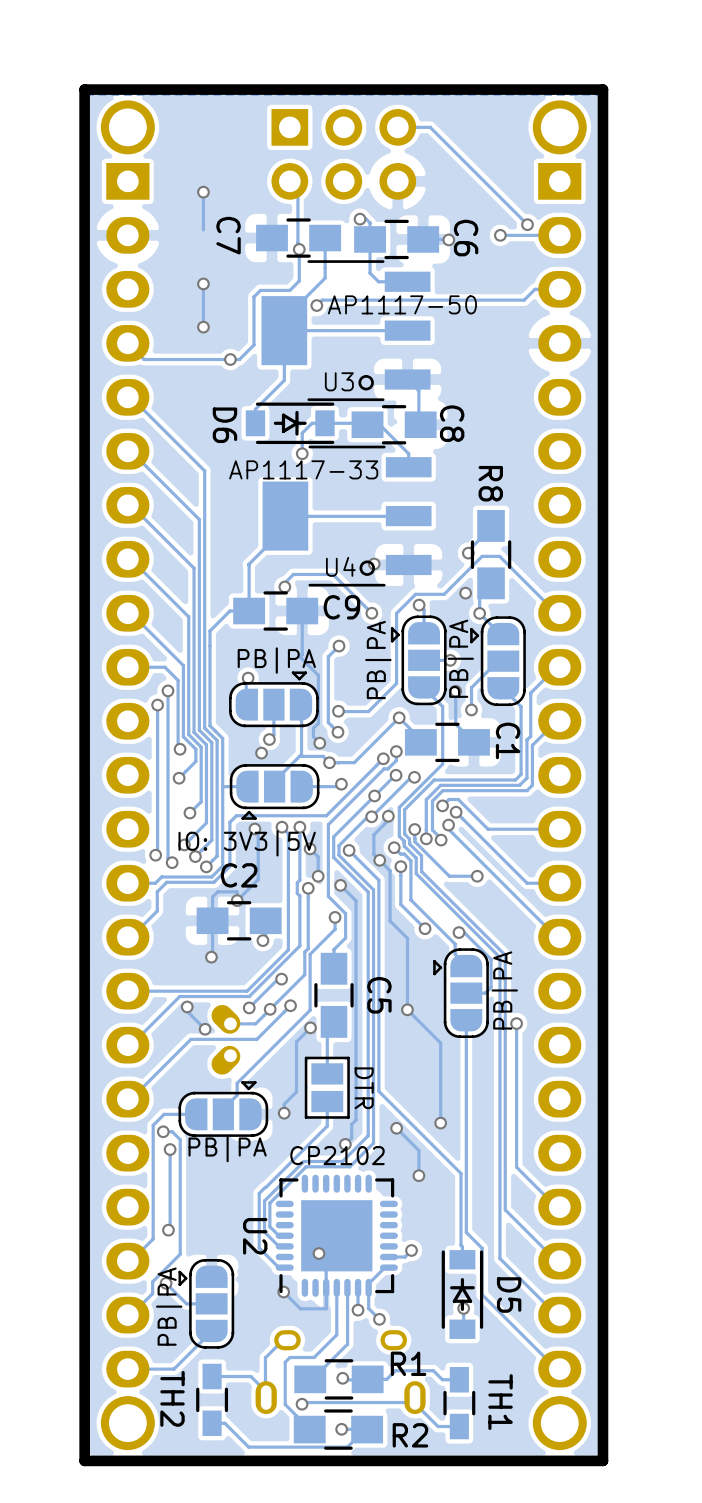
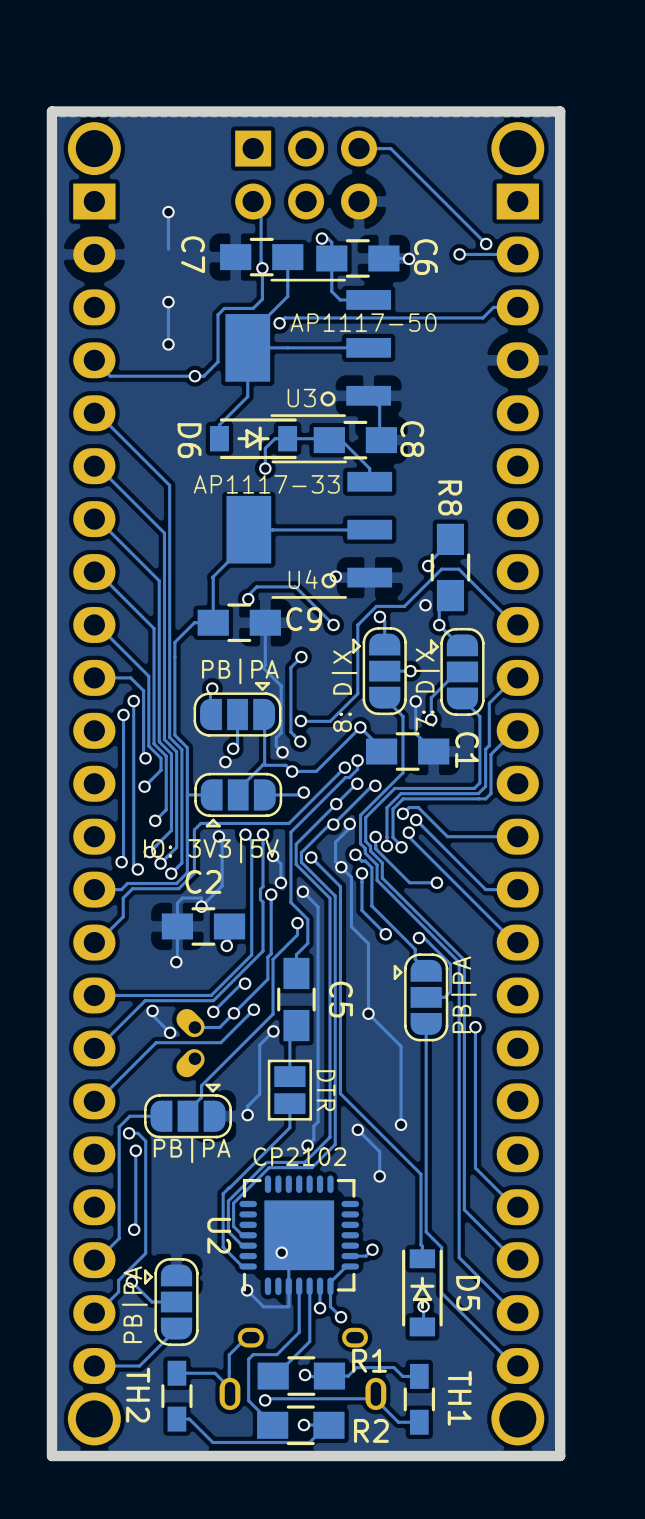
text: PB|PA (460, 658) -> 7: D|X (427, 689)
text: PB|PA (378, 660) -> 8: D|X (344, 691)

